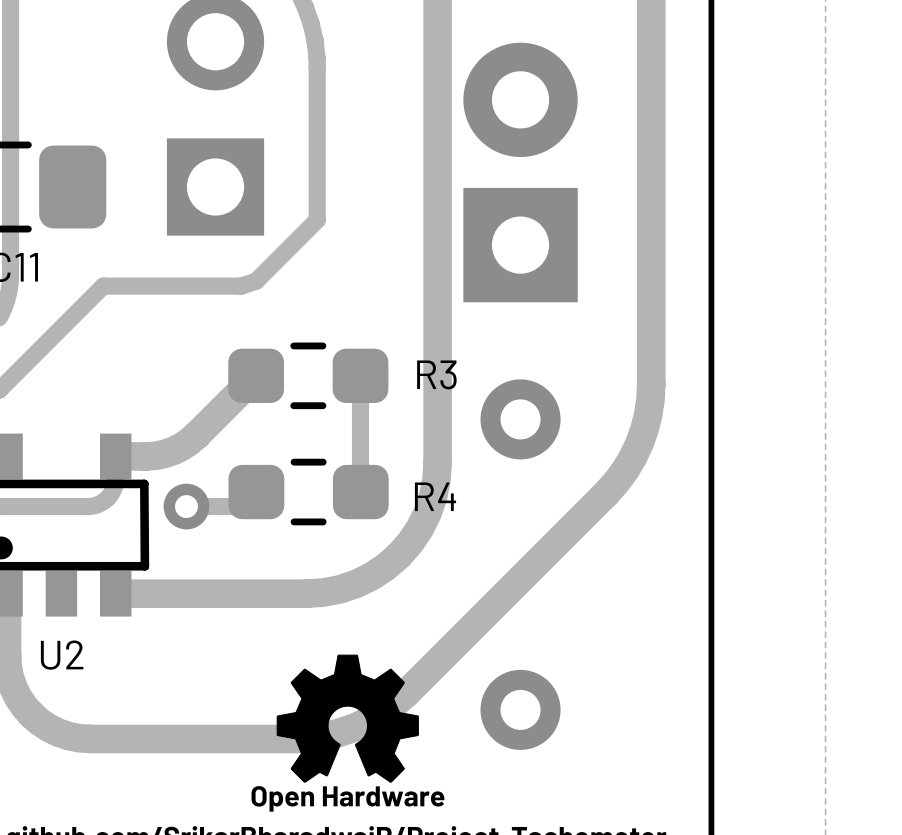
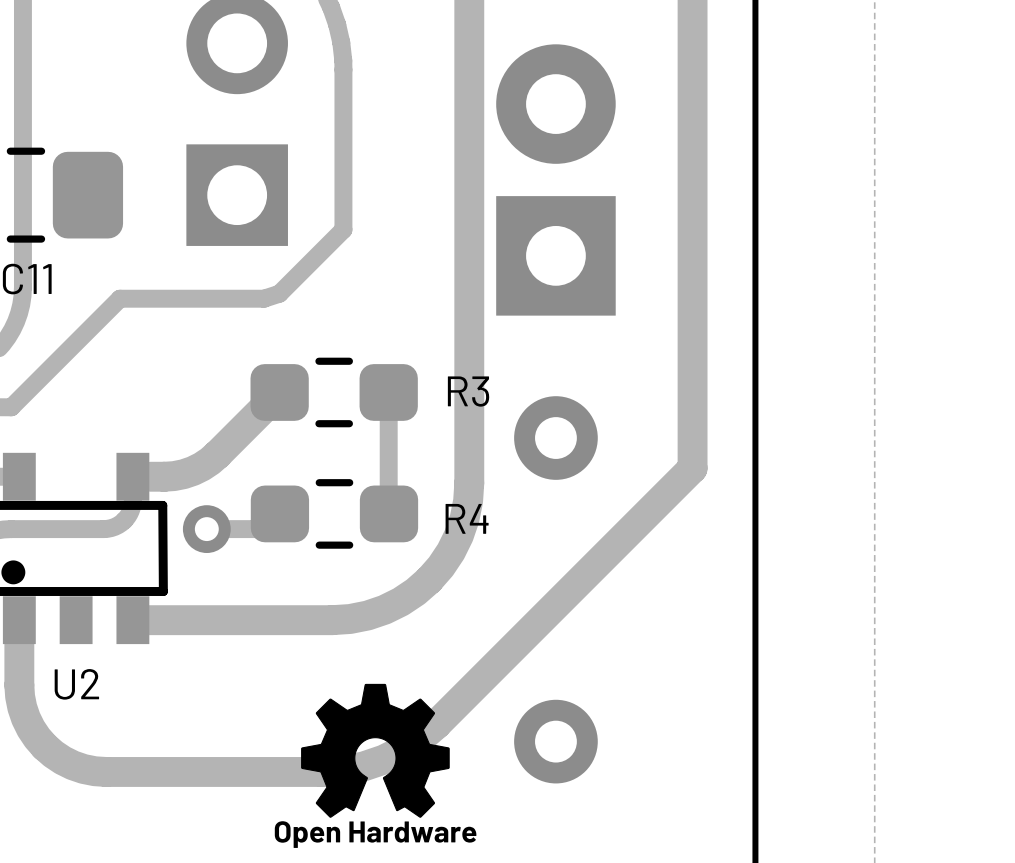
track: (651, 384) (648, 414) (639, 443) (625, 470) (605, 494) -> (692, 401) (692, 468) (644, 516)

